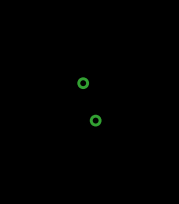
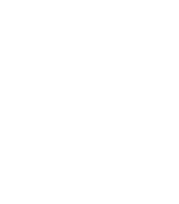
via: (83, 83) -> none
via: (95, 120) -> none

